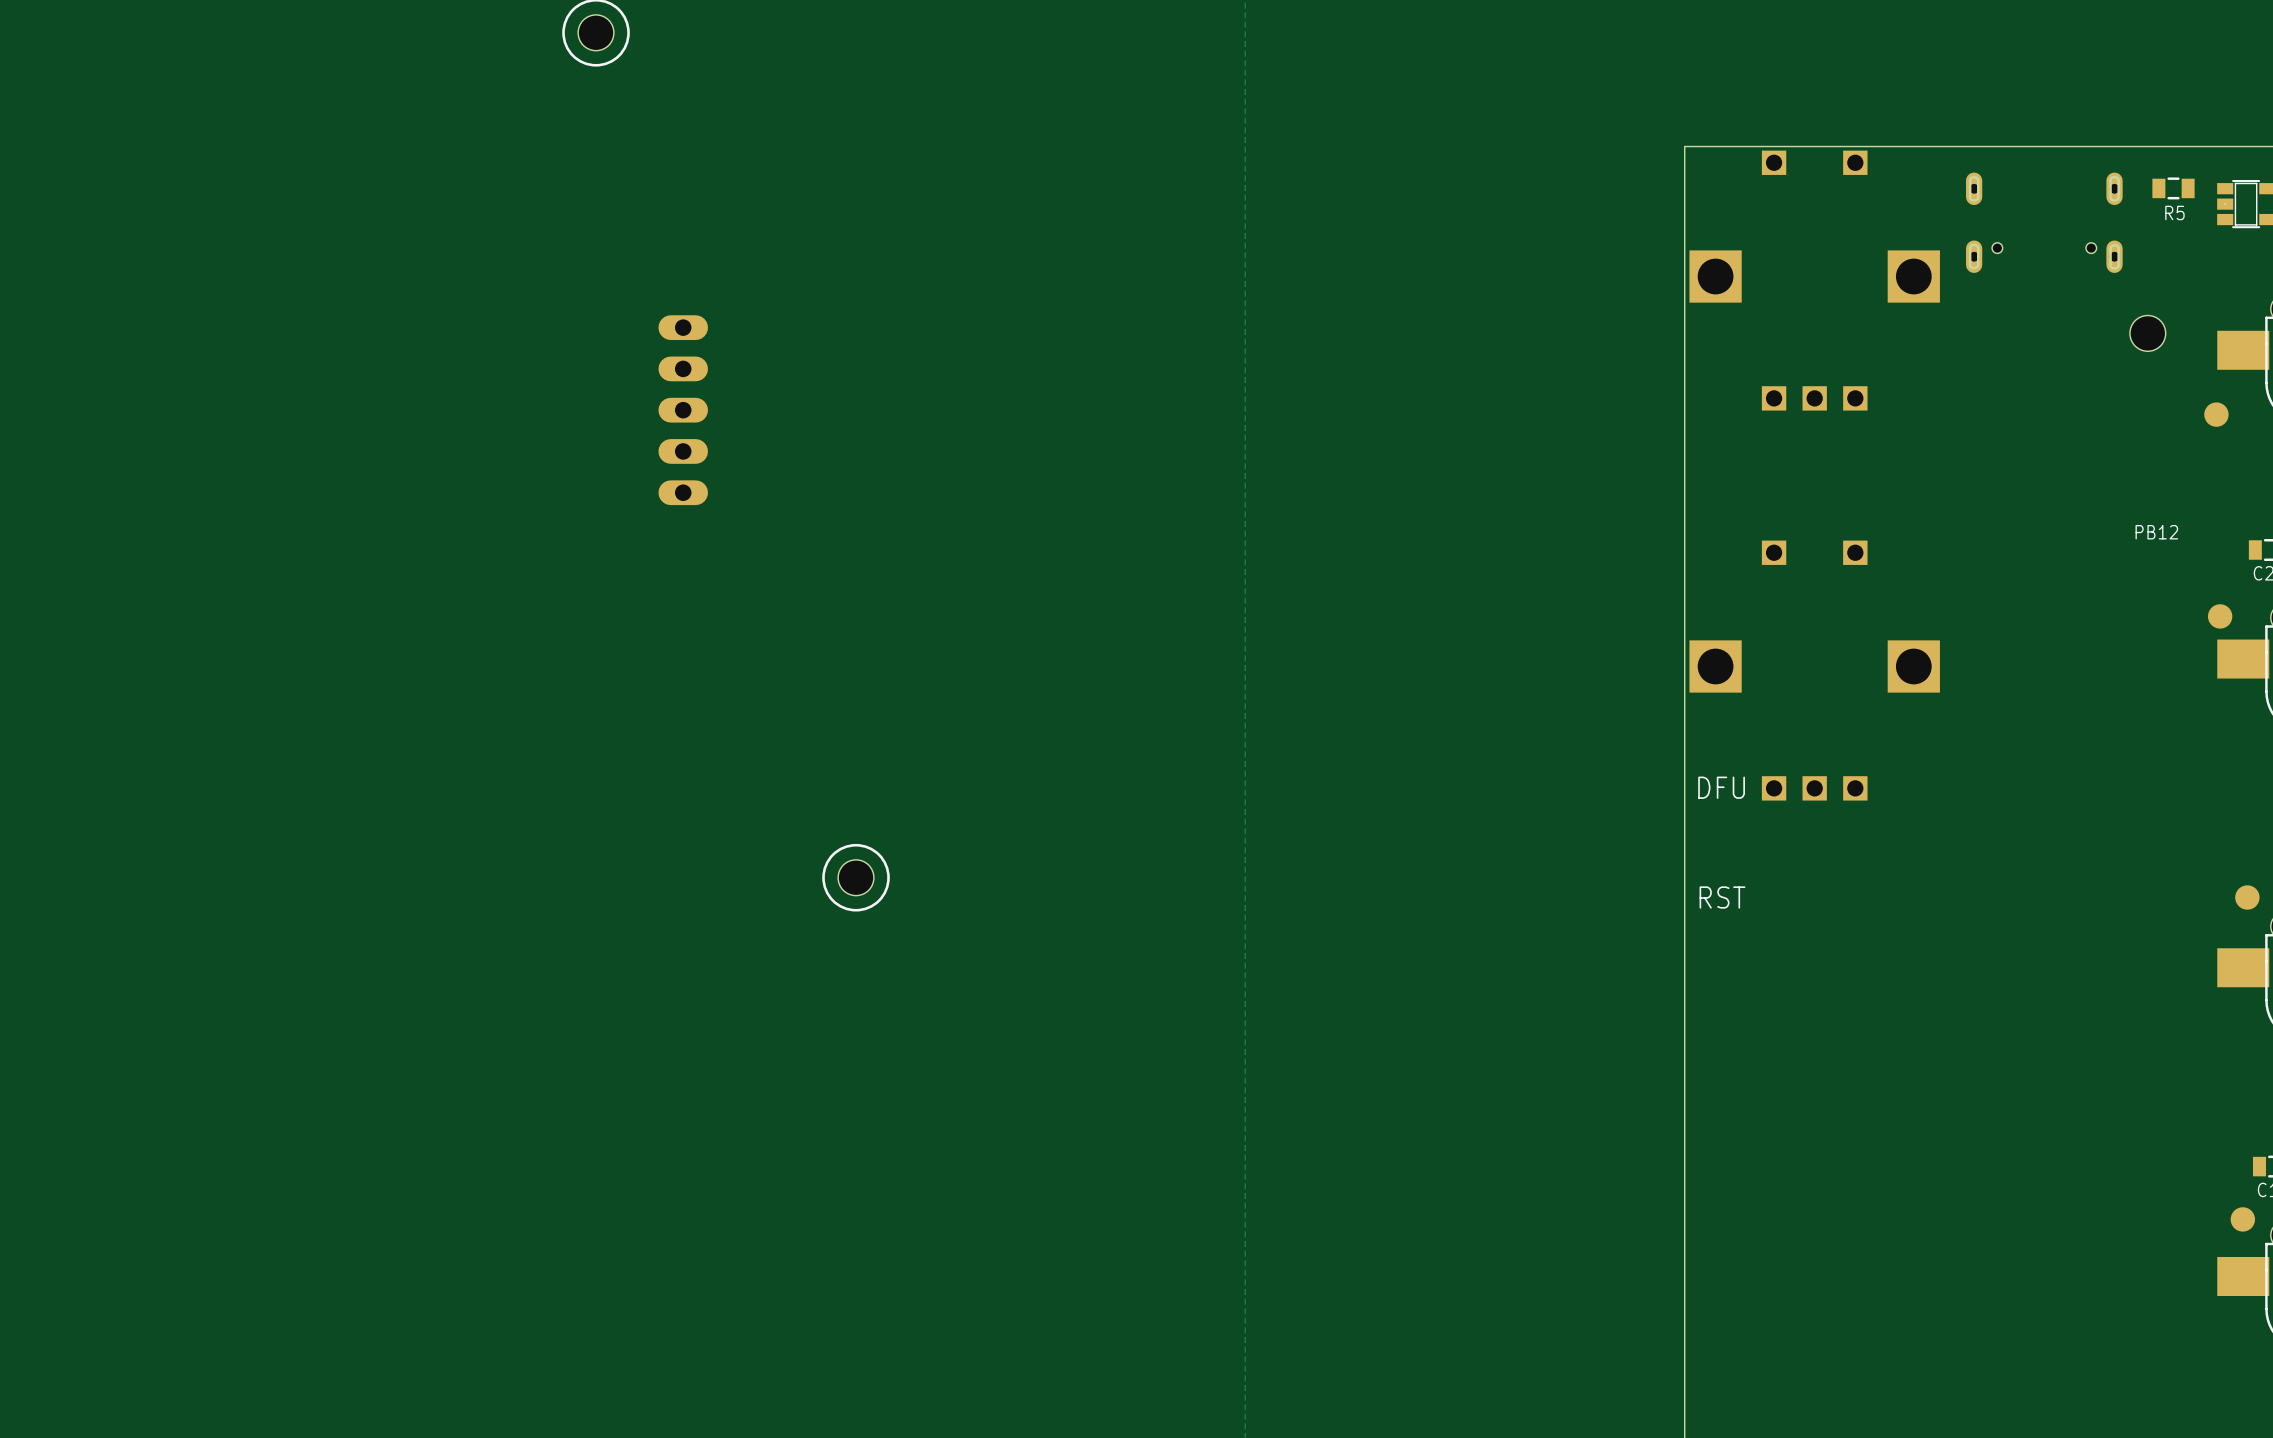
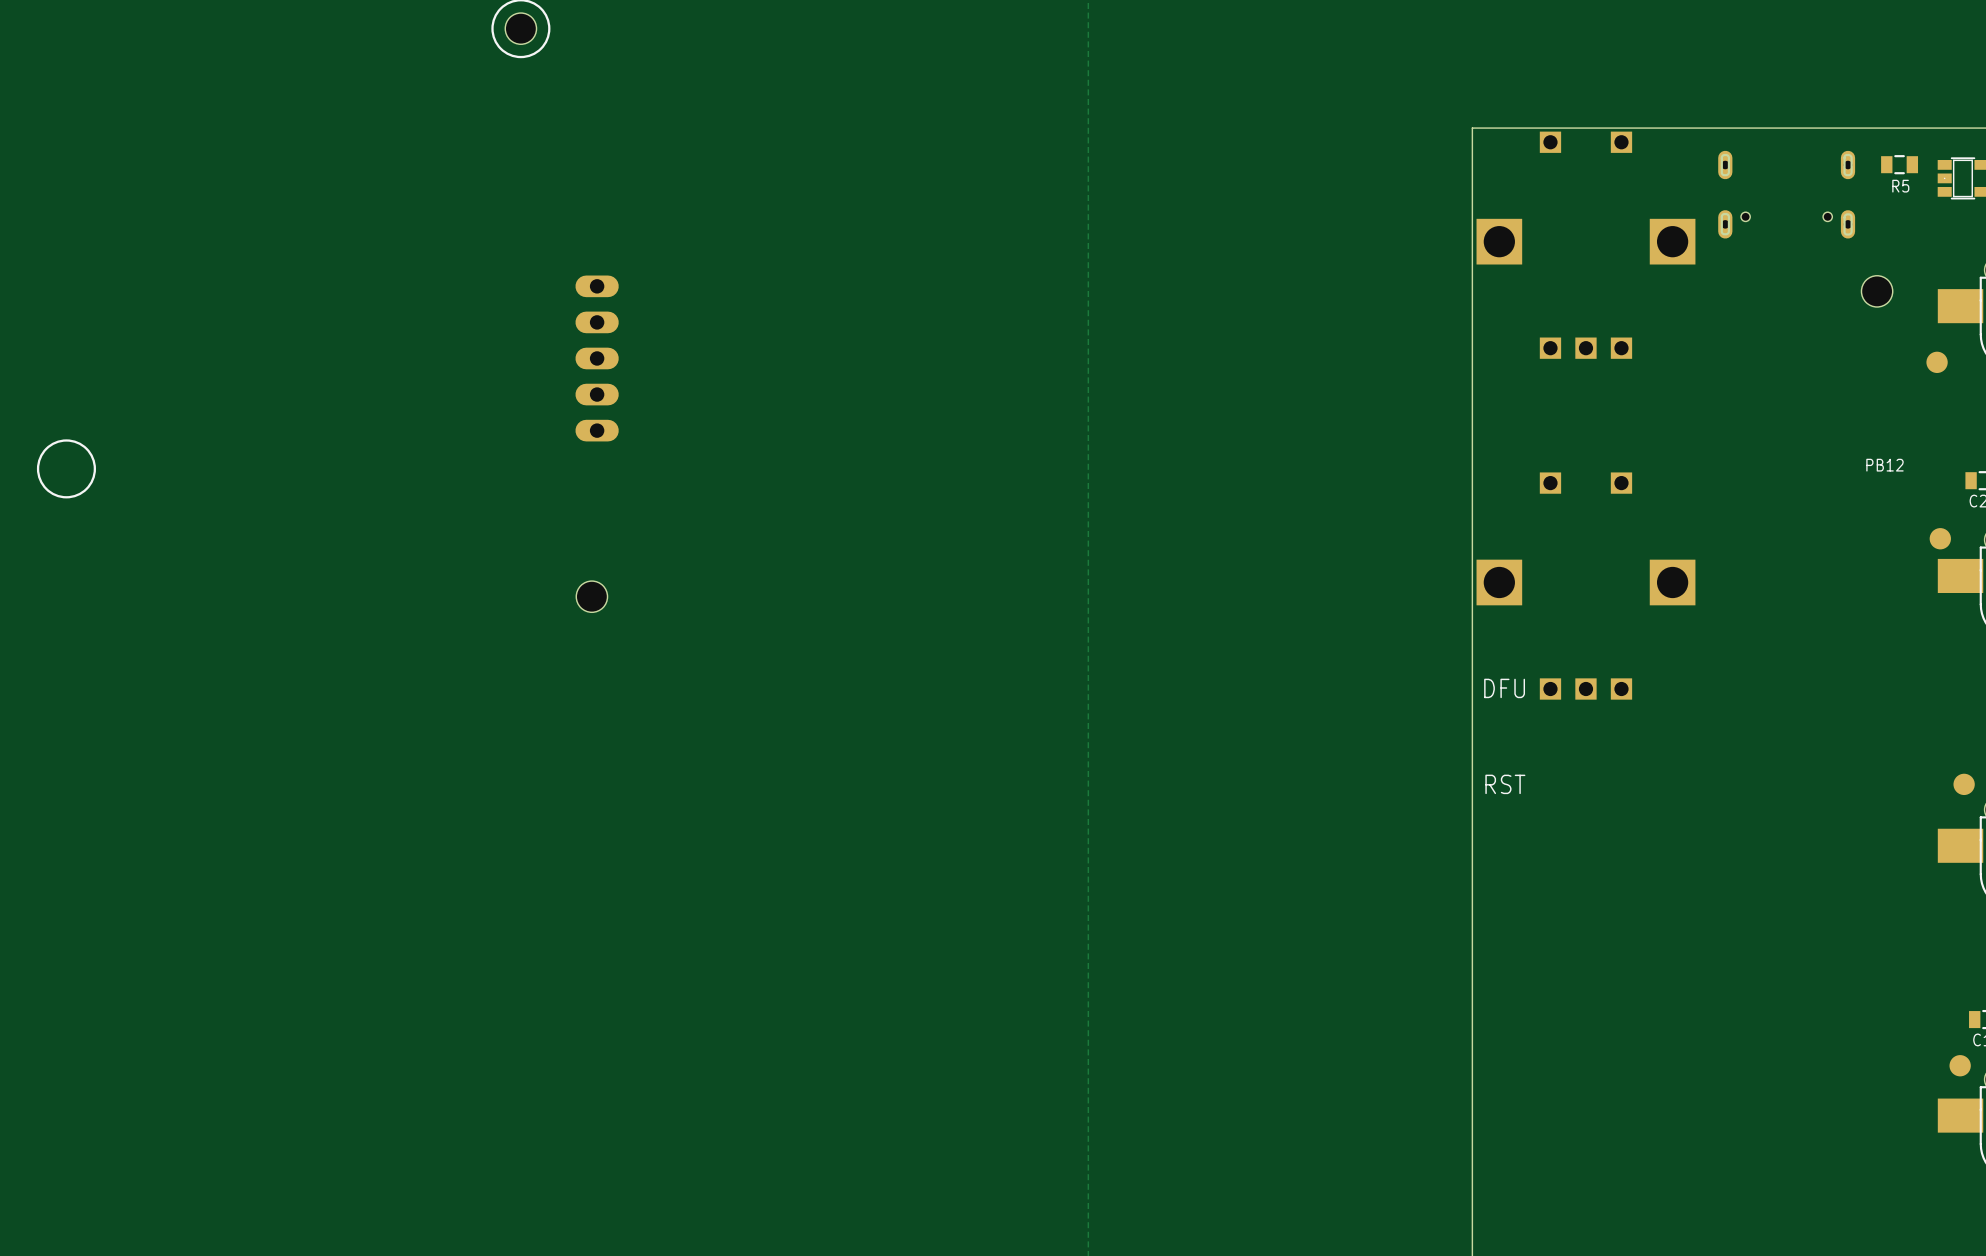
drawing: none -> [36, 439, 97, 499]
drawing: [822, 843, 890, 912] -> none
part position: (856, 877) -> (591, 596)

